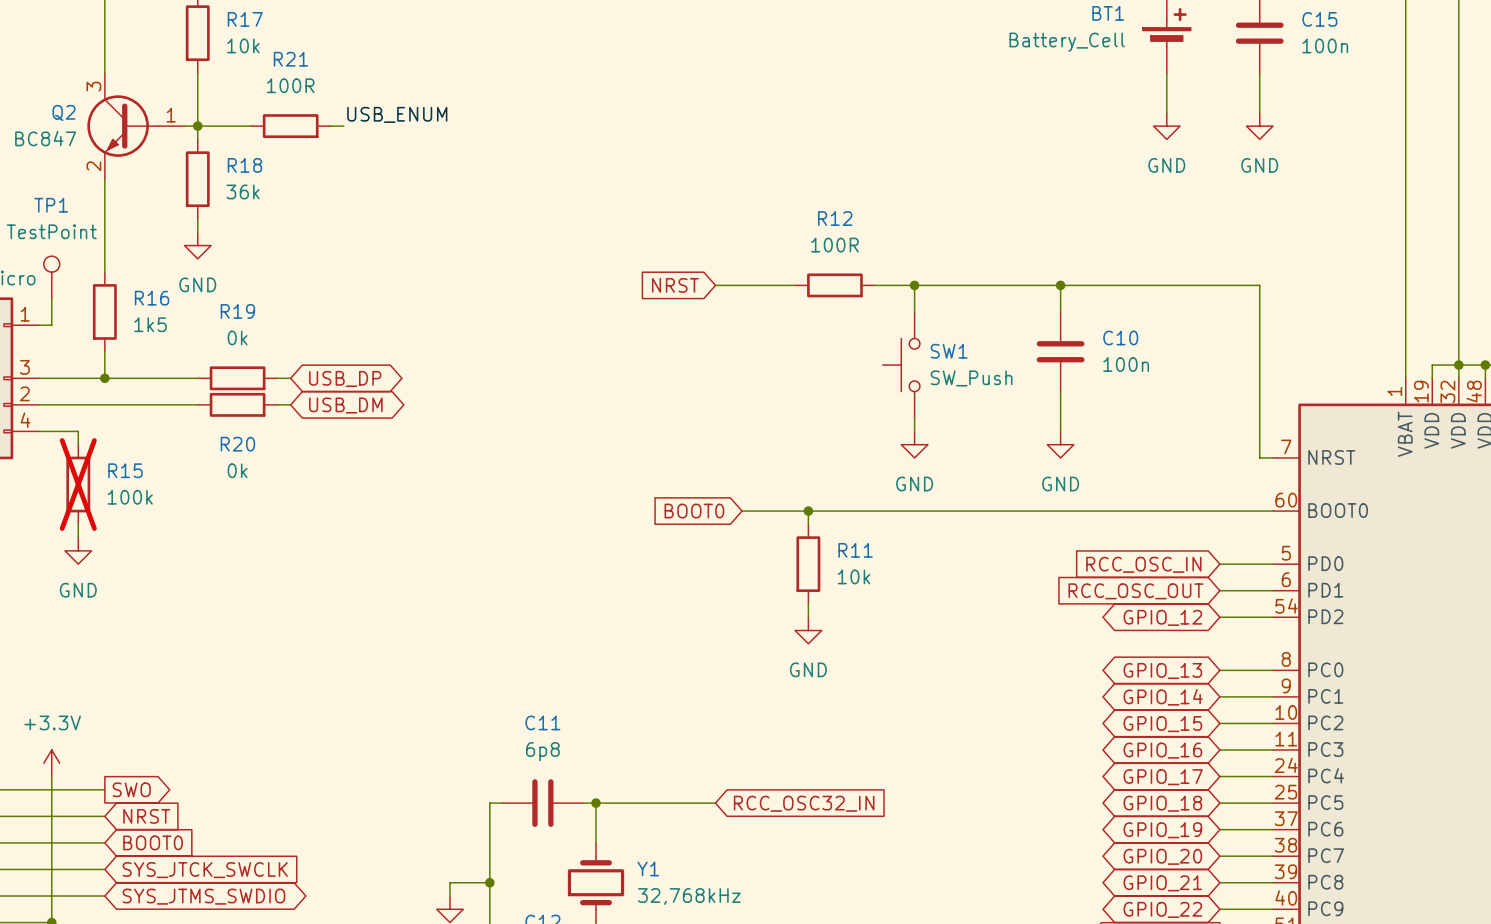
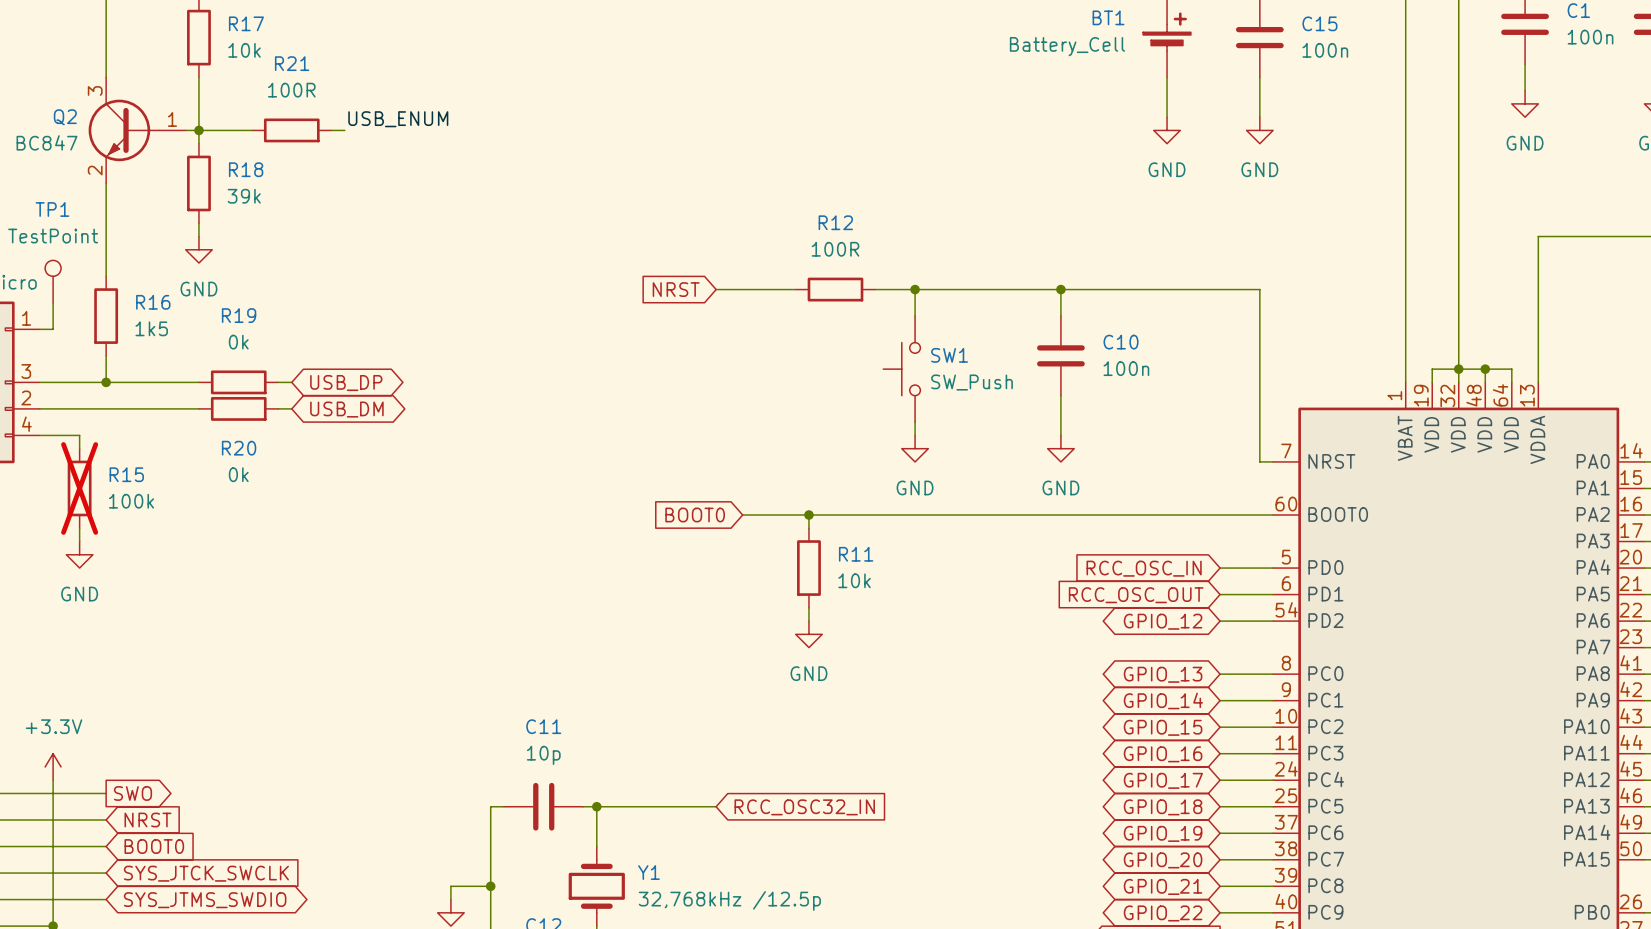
R18 value: 36k (243, 191) -> 39k (244, 196)
C11 value: 6p8 (542, 751) -> 10p (543, 755)
Y1 value: 32,768kHz (689, 896) -> 32,768kHz /12.5p (729, 900)

